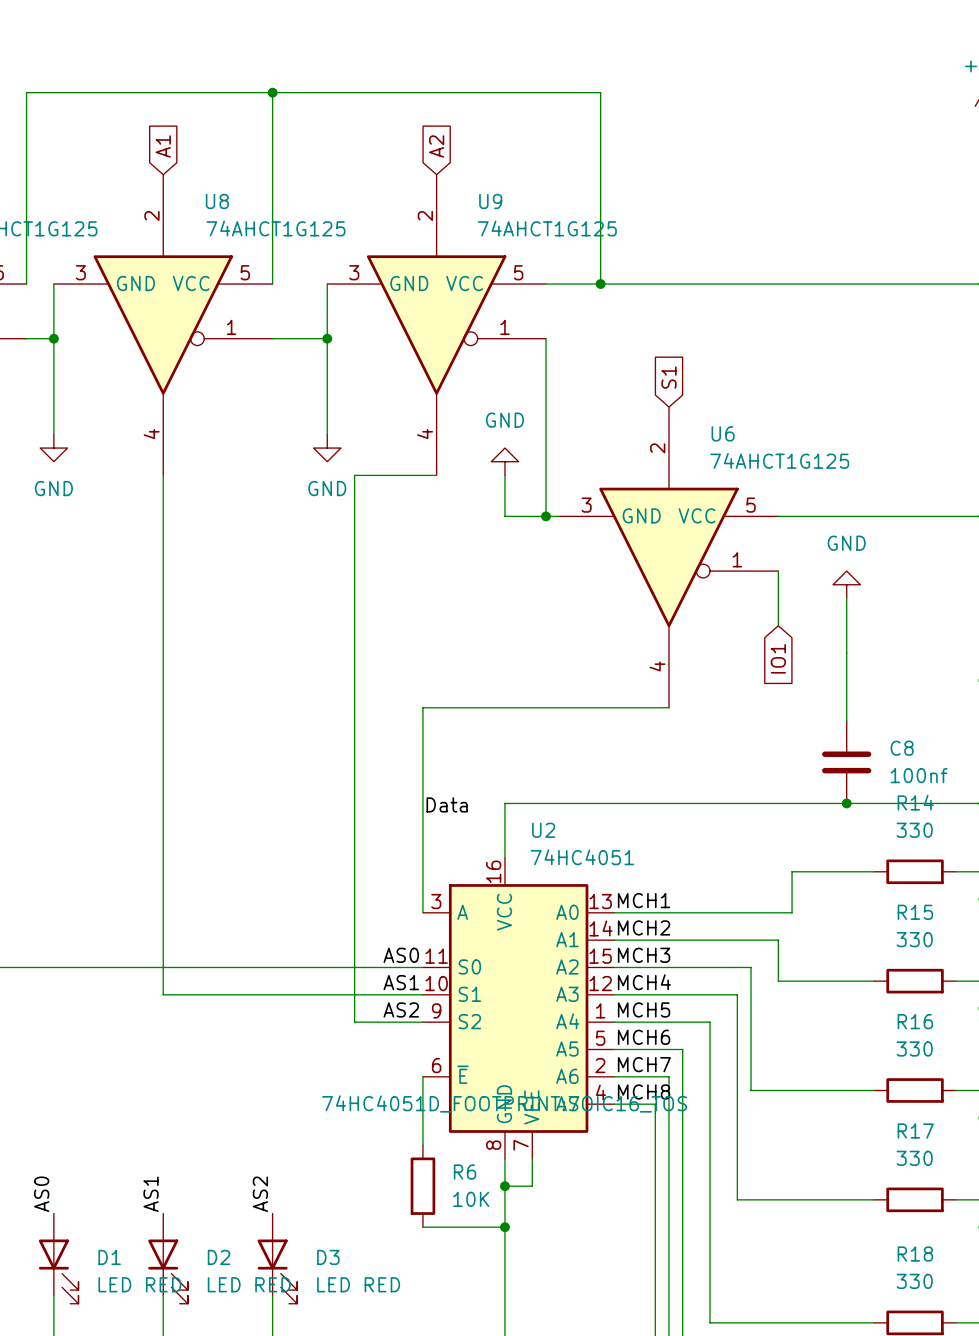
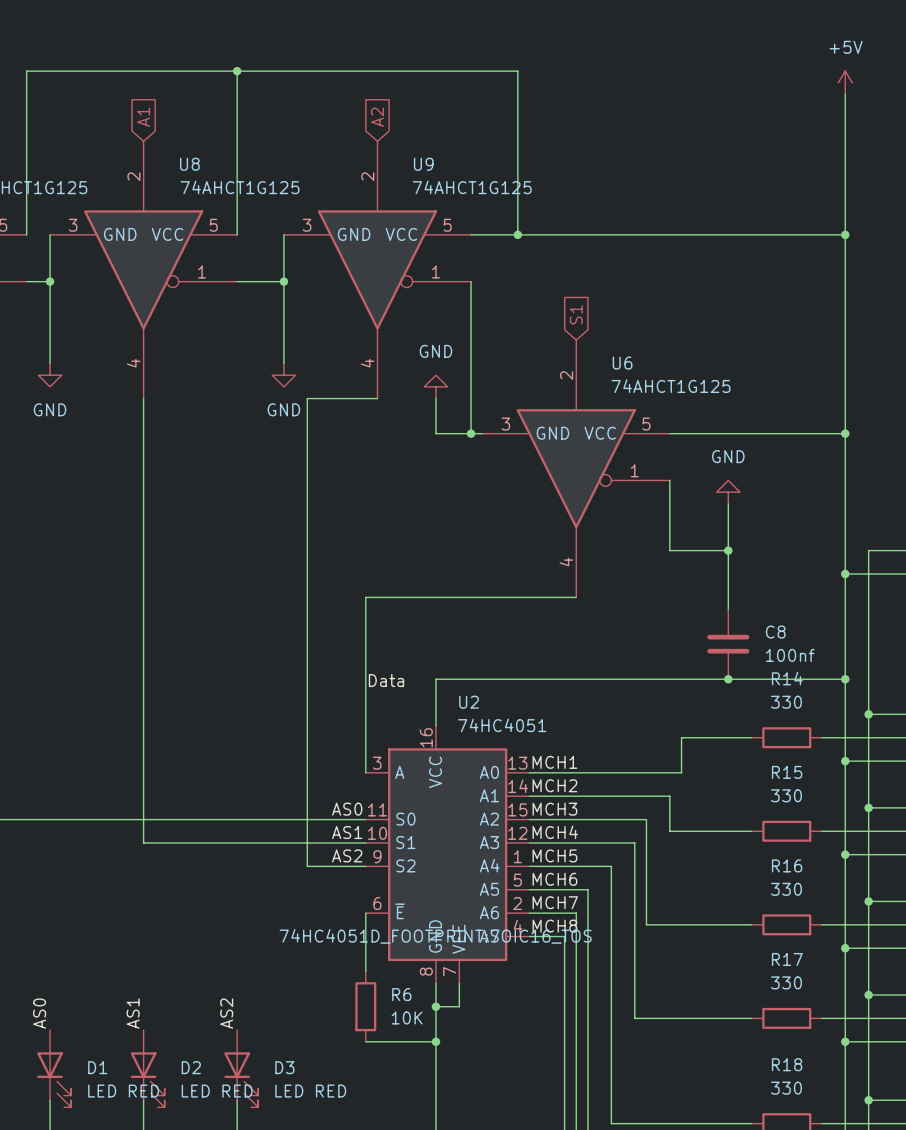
wire: none -> (669, 527) (669, 550) (728, 550)
junction: none -> (728, 550)
global label: IO1 (778, 658) -> none

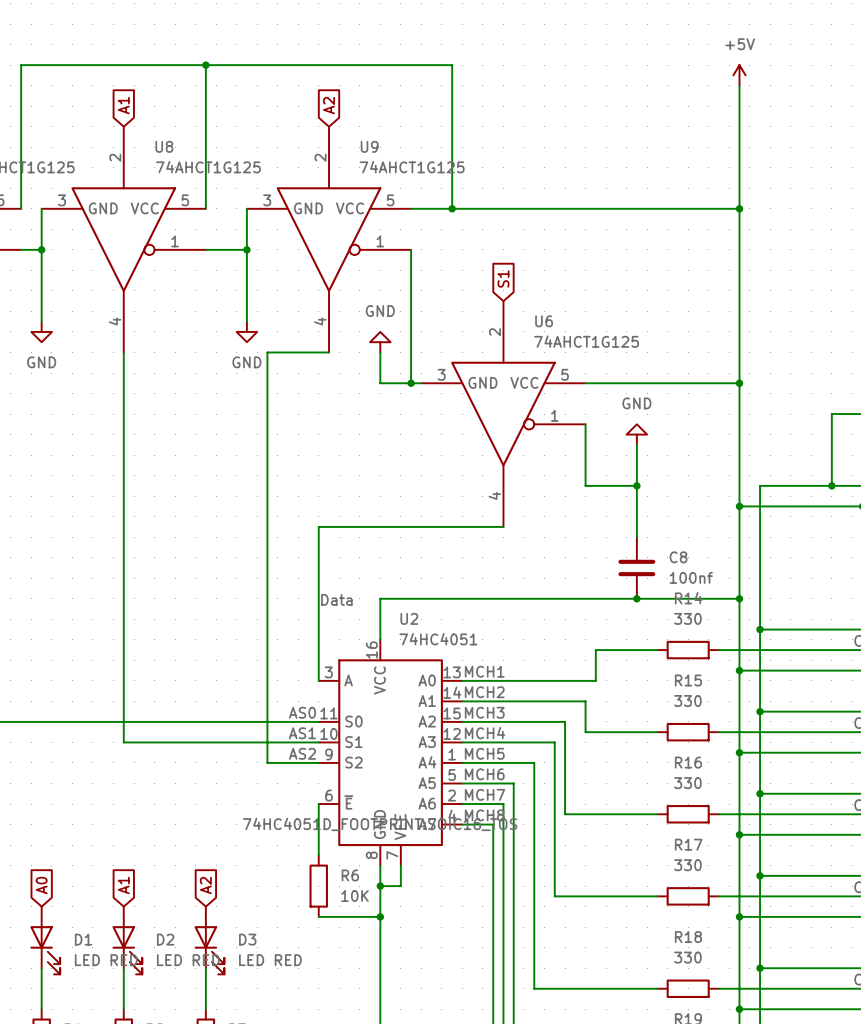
global label: none -> A0 (41, 885)
global label: none -> A1 (123, 885)
global label: none -> A2 (205, 885)
label: AS0 (39, 1013) -> none
label: AS1 (133, 1013) -> none
label: AS2 (226, 1013) -> none

